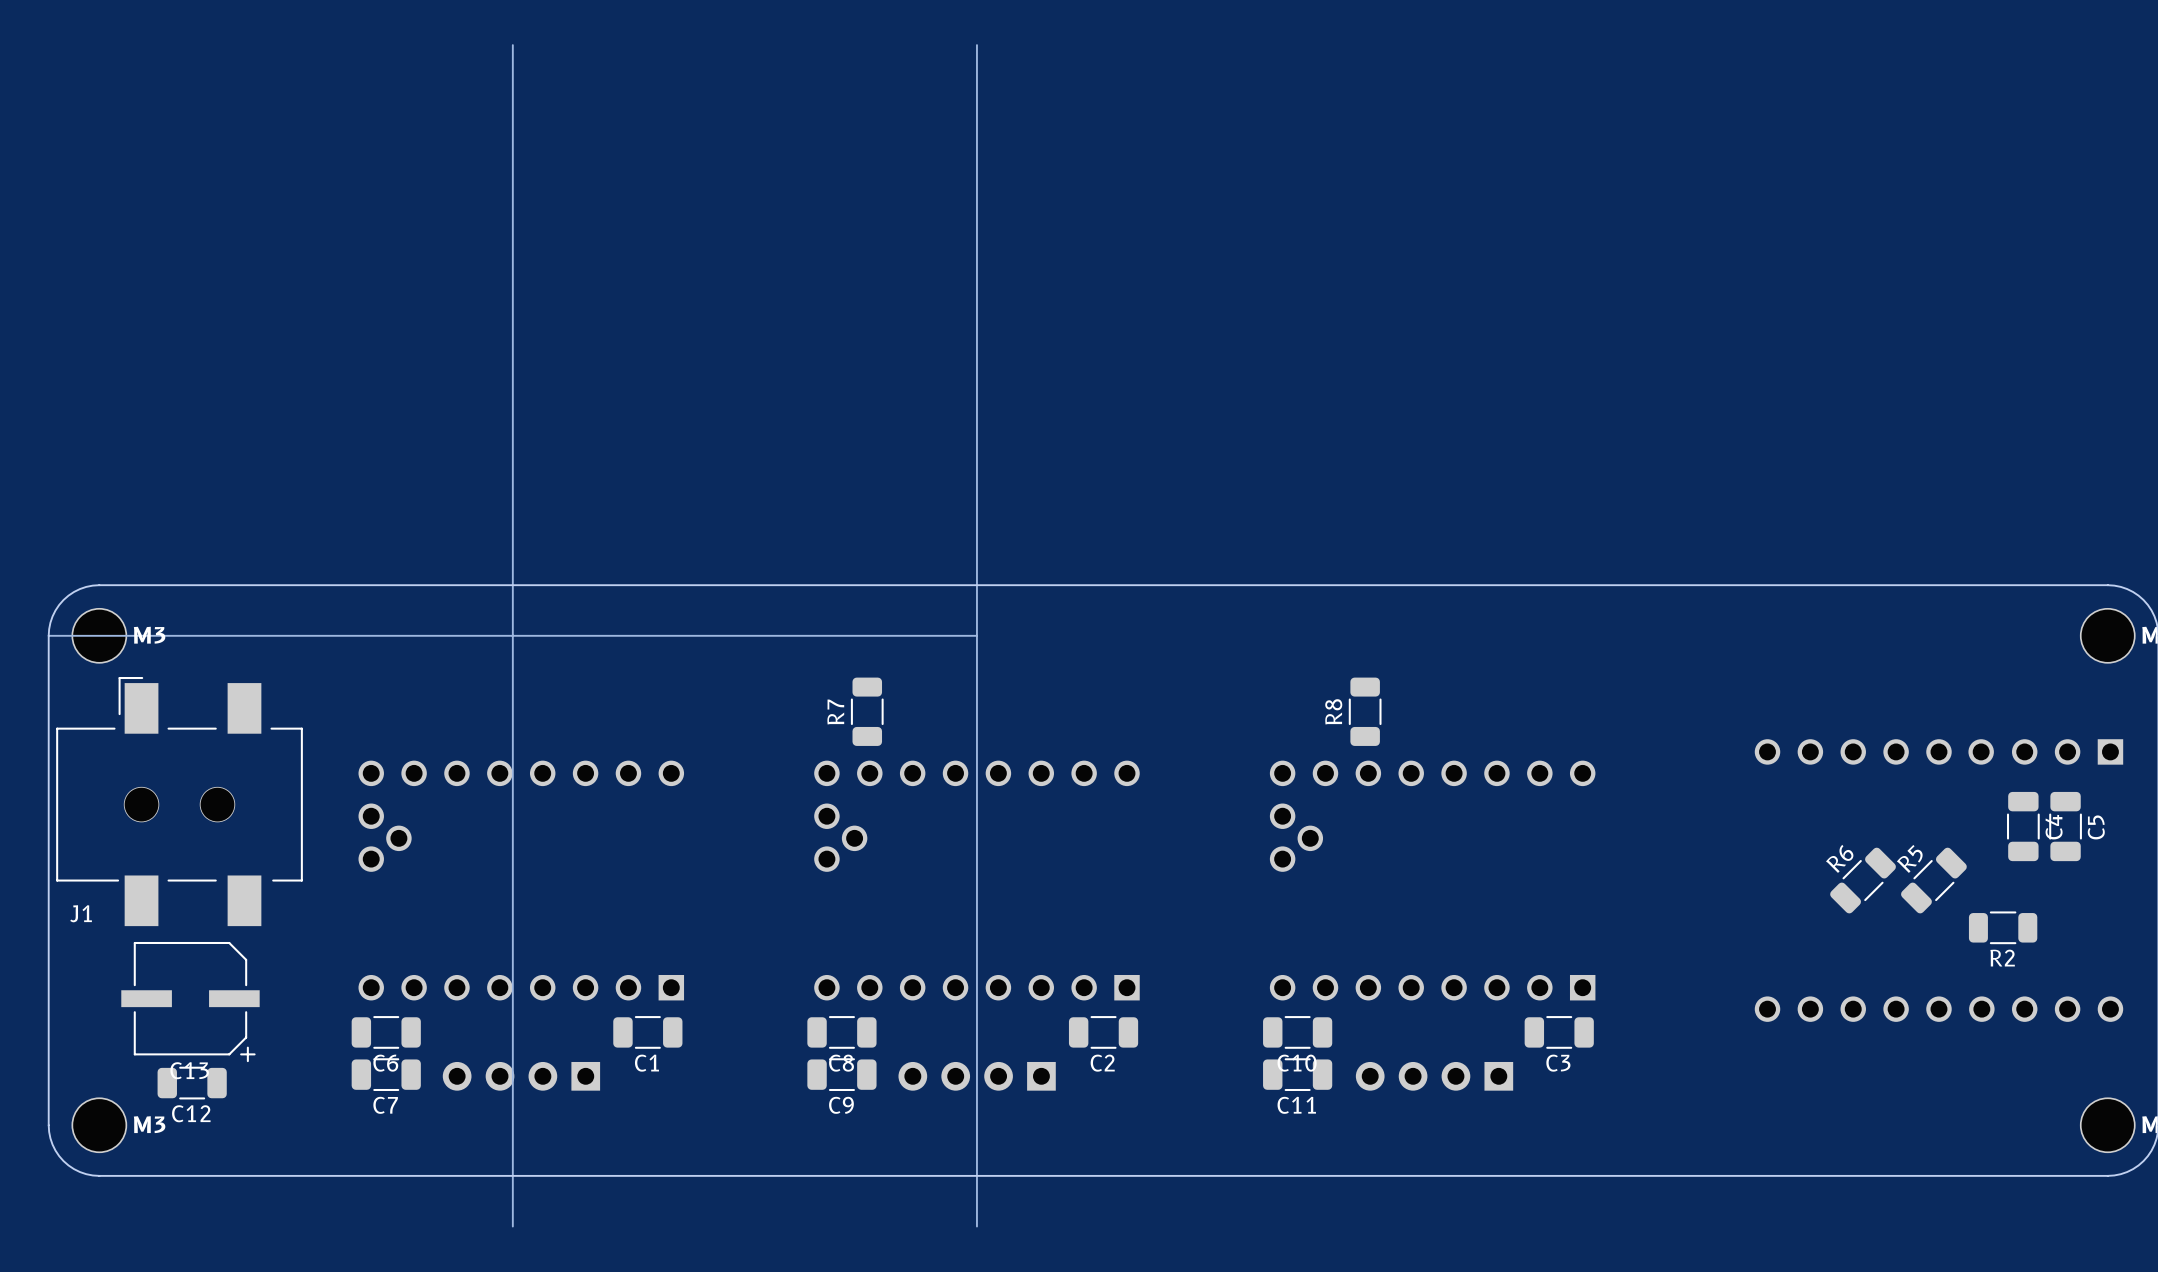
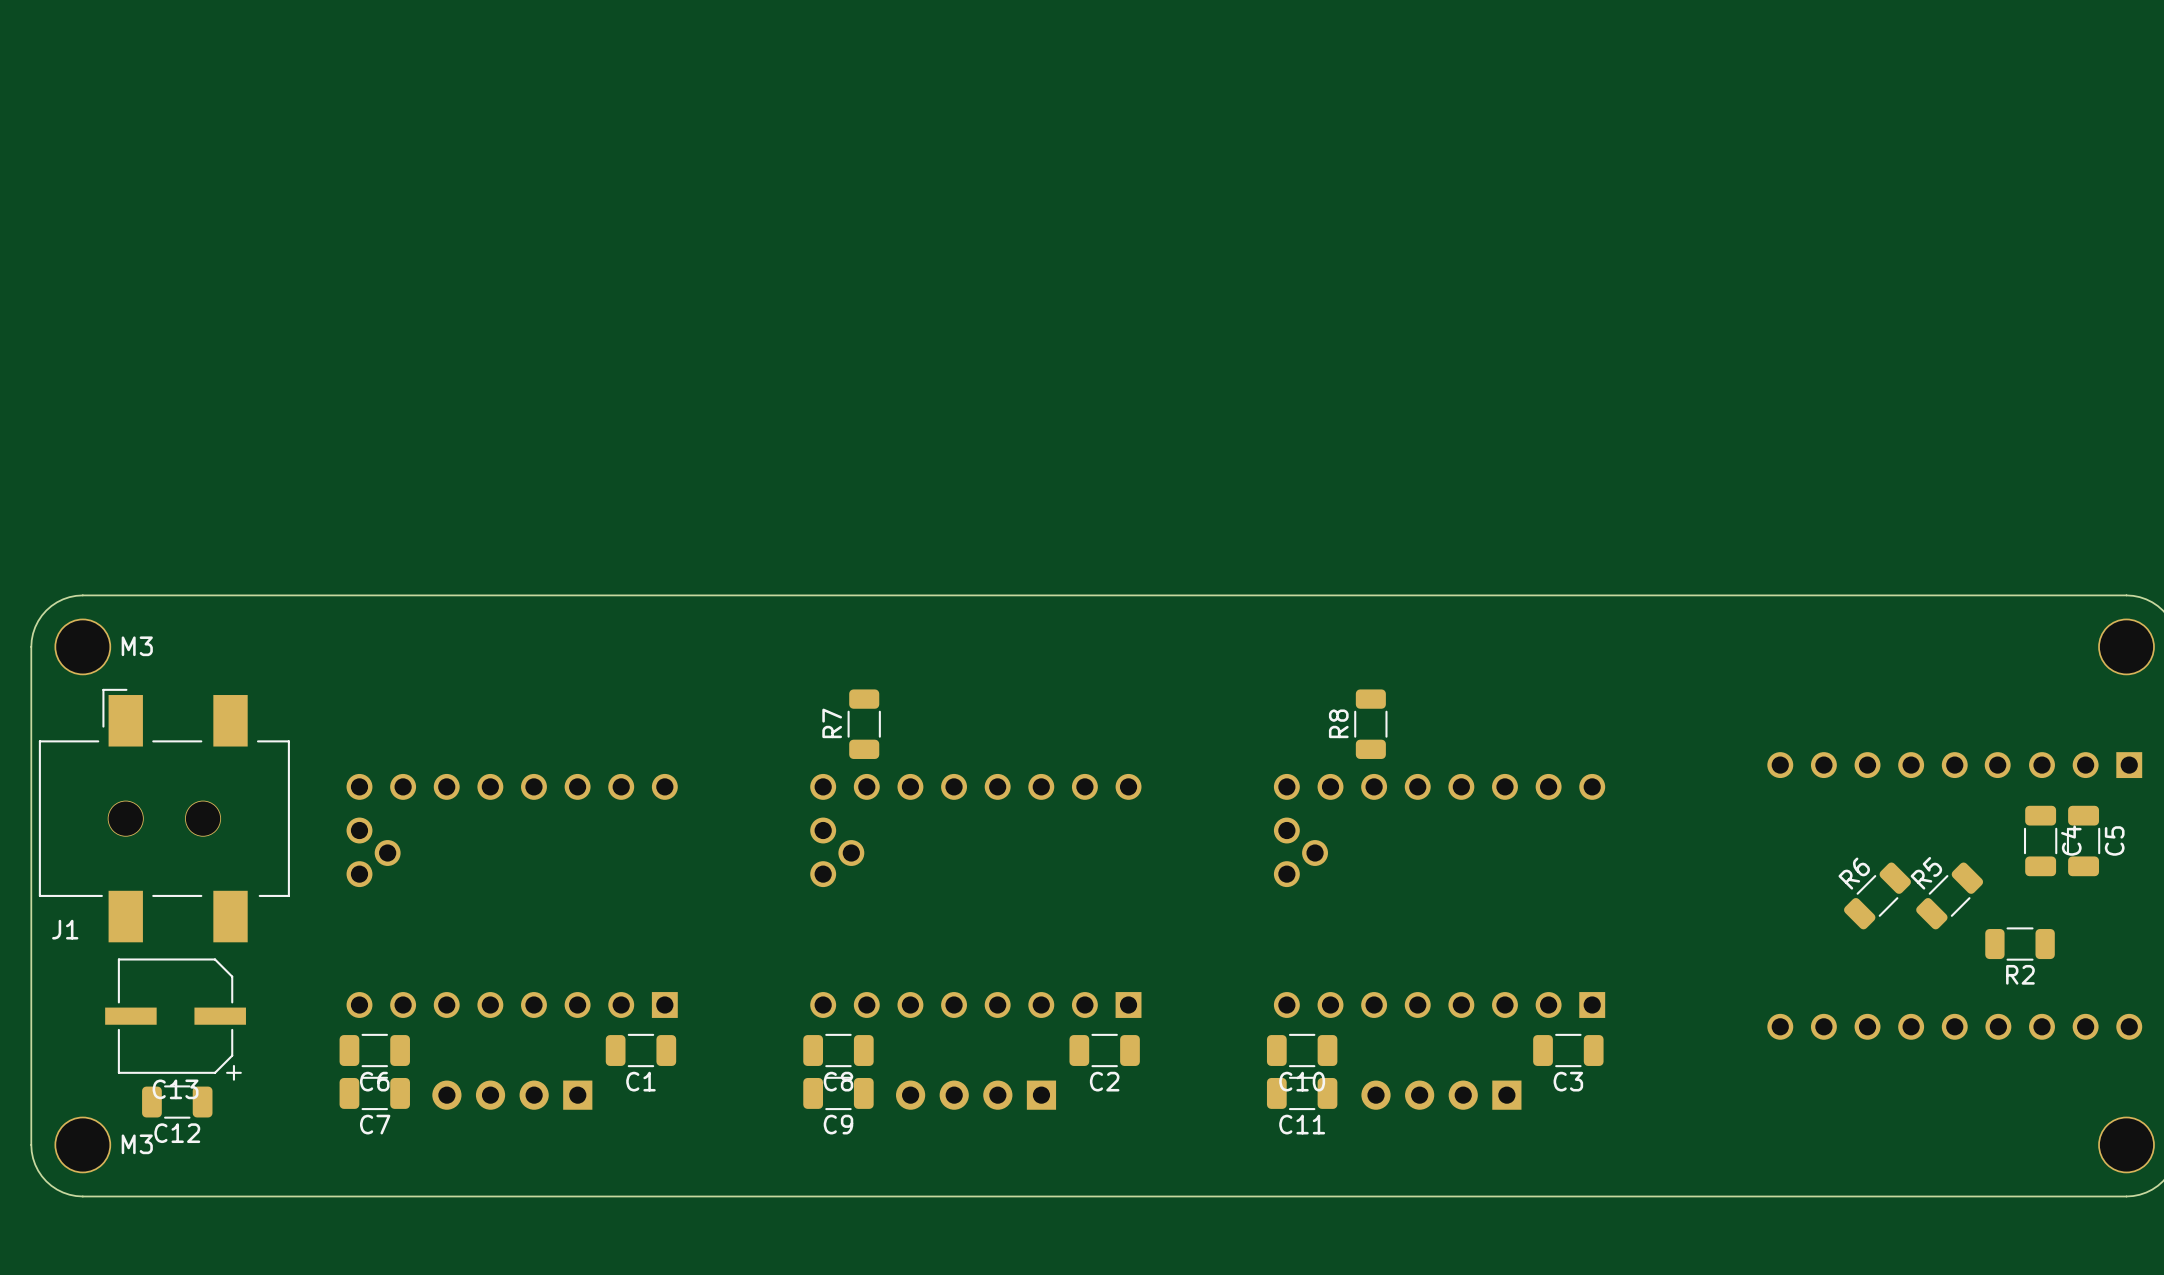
line: (512, 45) (512, 1226) -> none
line: (976, 45) (976, 1226) -> none
line: (48, 635) (976, 635) -> none

